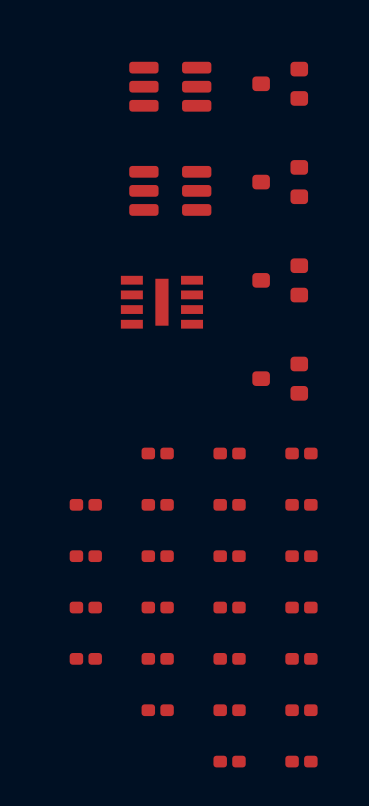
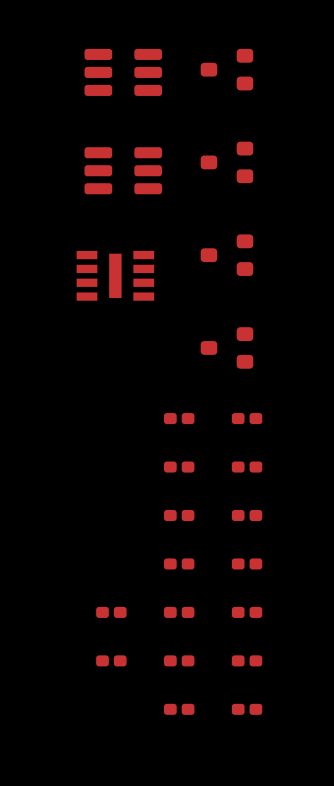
part: (157, 453) -> none
part: (85, 504) -> none
part: (157, 504) -> none
part: (85, 556) -> none
part: (157, 556) -> none
part: (85, 607) -> none
part: (157, 607) -> none
part: (85, 658) -> none

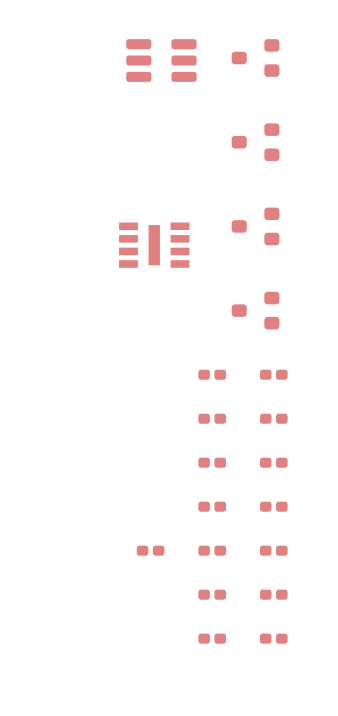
part: (123, 170) -> none
part: (111, 660) -> none

